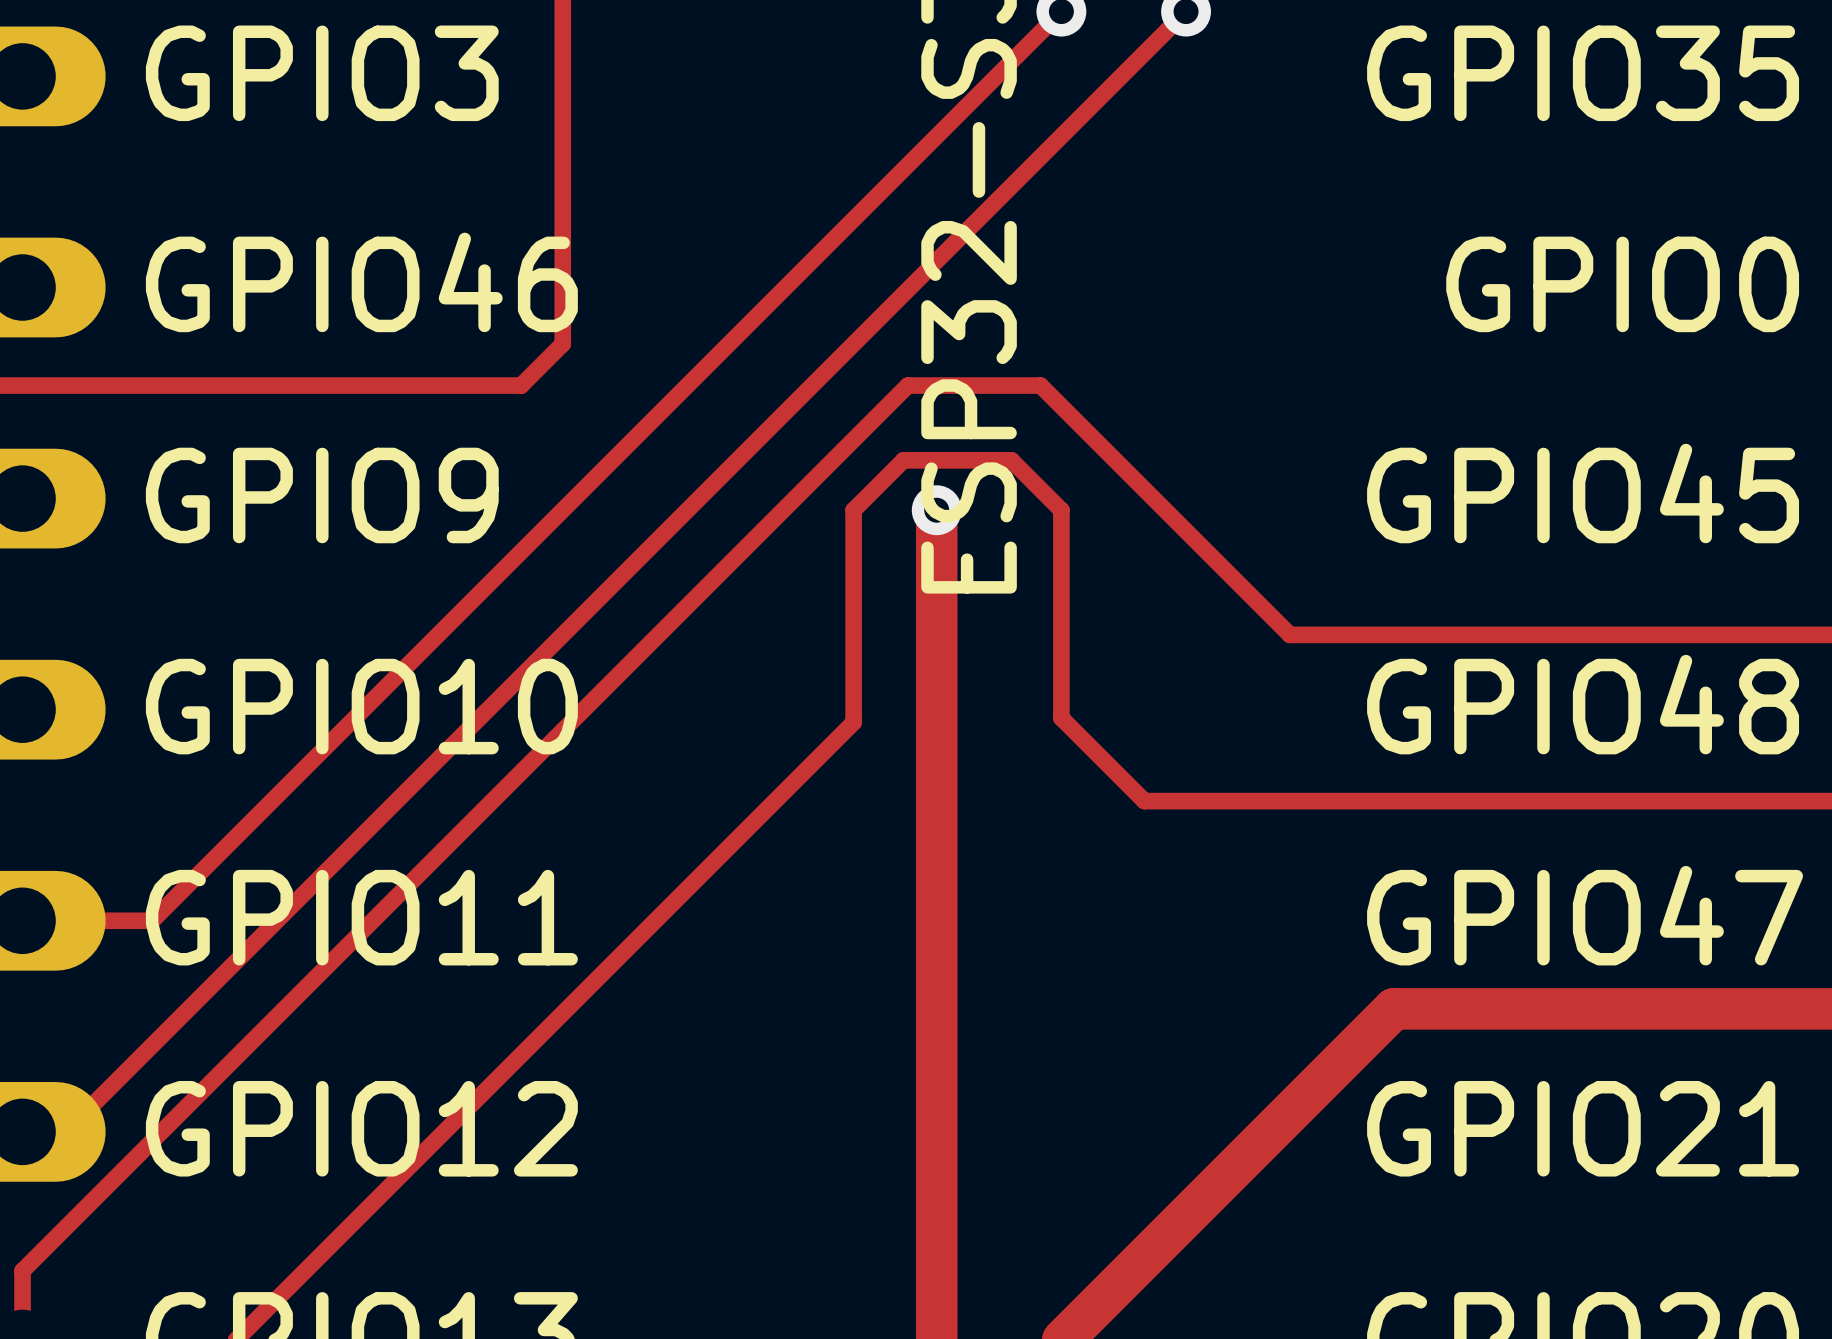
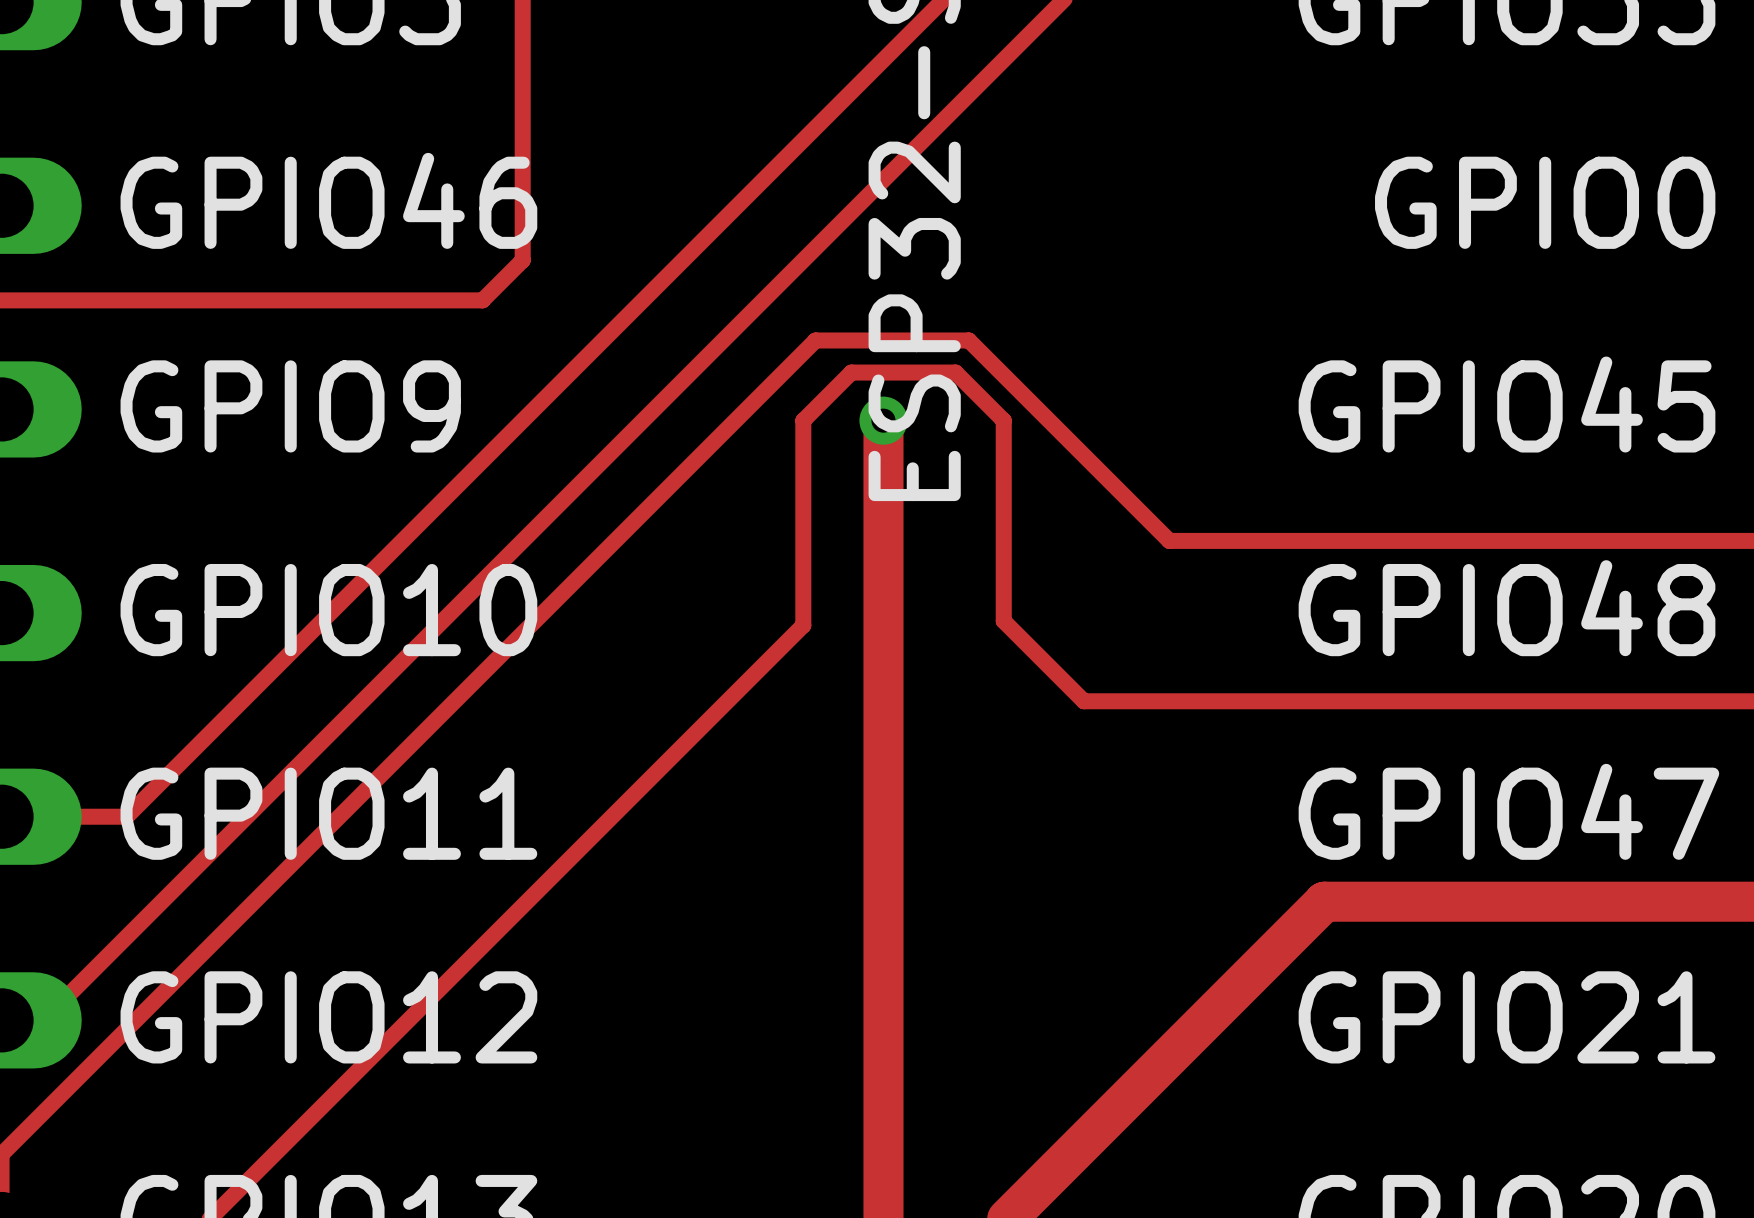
track: (866, 427) (907, 385) (1040, 385) (1289, 634) -> (815, 340) (968, 340) (1169, 540) (1224, 540)

